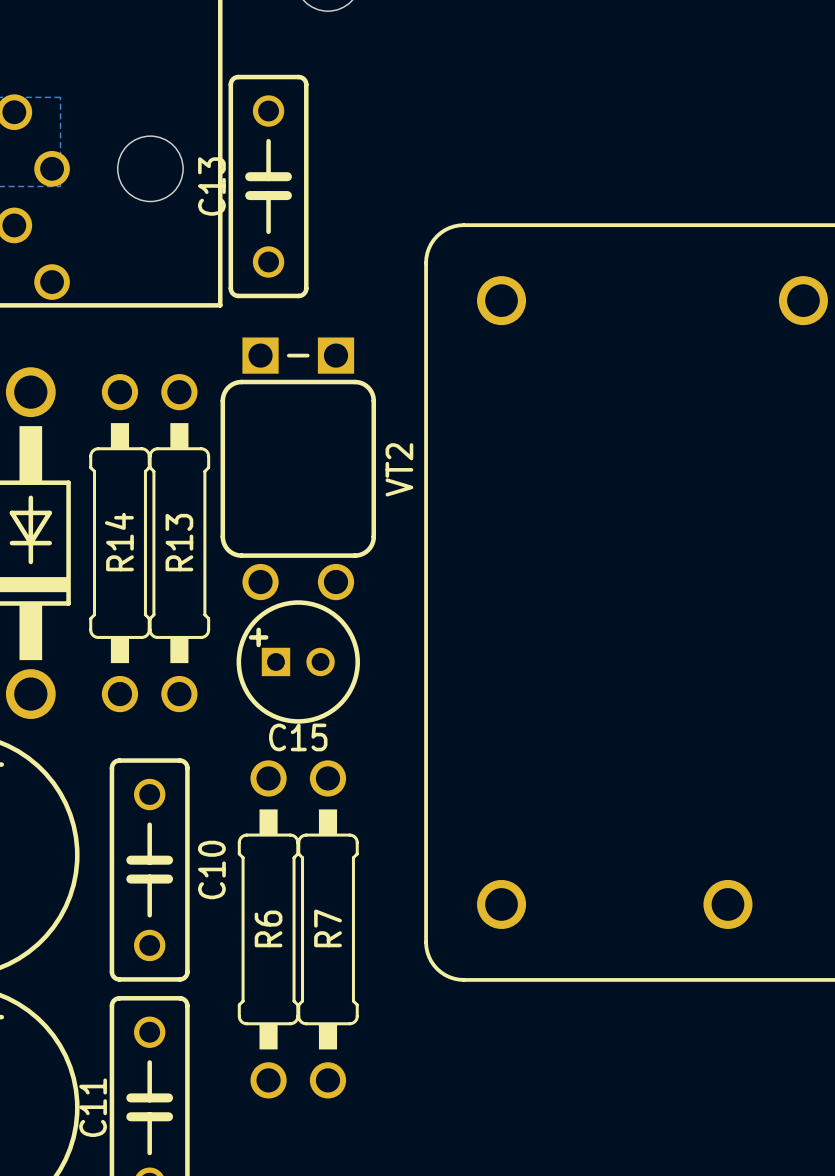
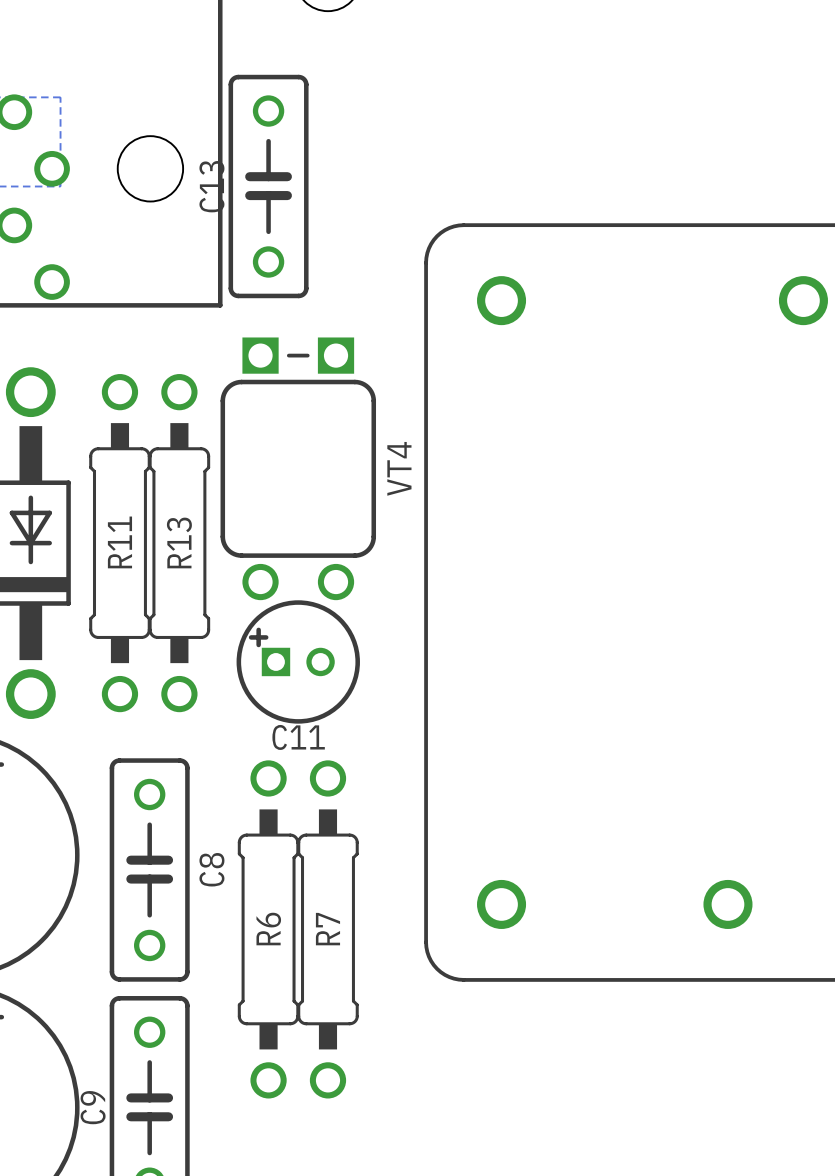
VT2 name: VT2 (399, 469) -> VT4 (399, 468)
R14 name: R14 (119, 542) -> R11 (119, 542)
C15 name: C15 (298, 737) -> C11 (298, 737)
C10 name: C10 (211, 869) -> C8 (211, 869)
C11 name: C11 (93, 1107) -> C9 (93, 1107)

